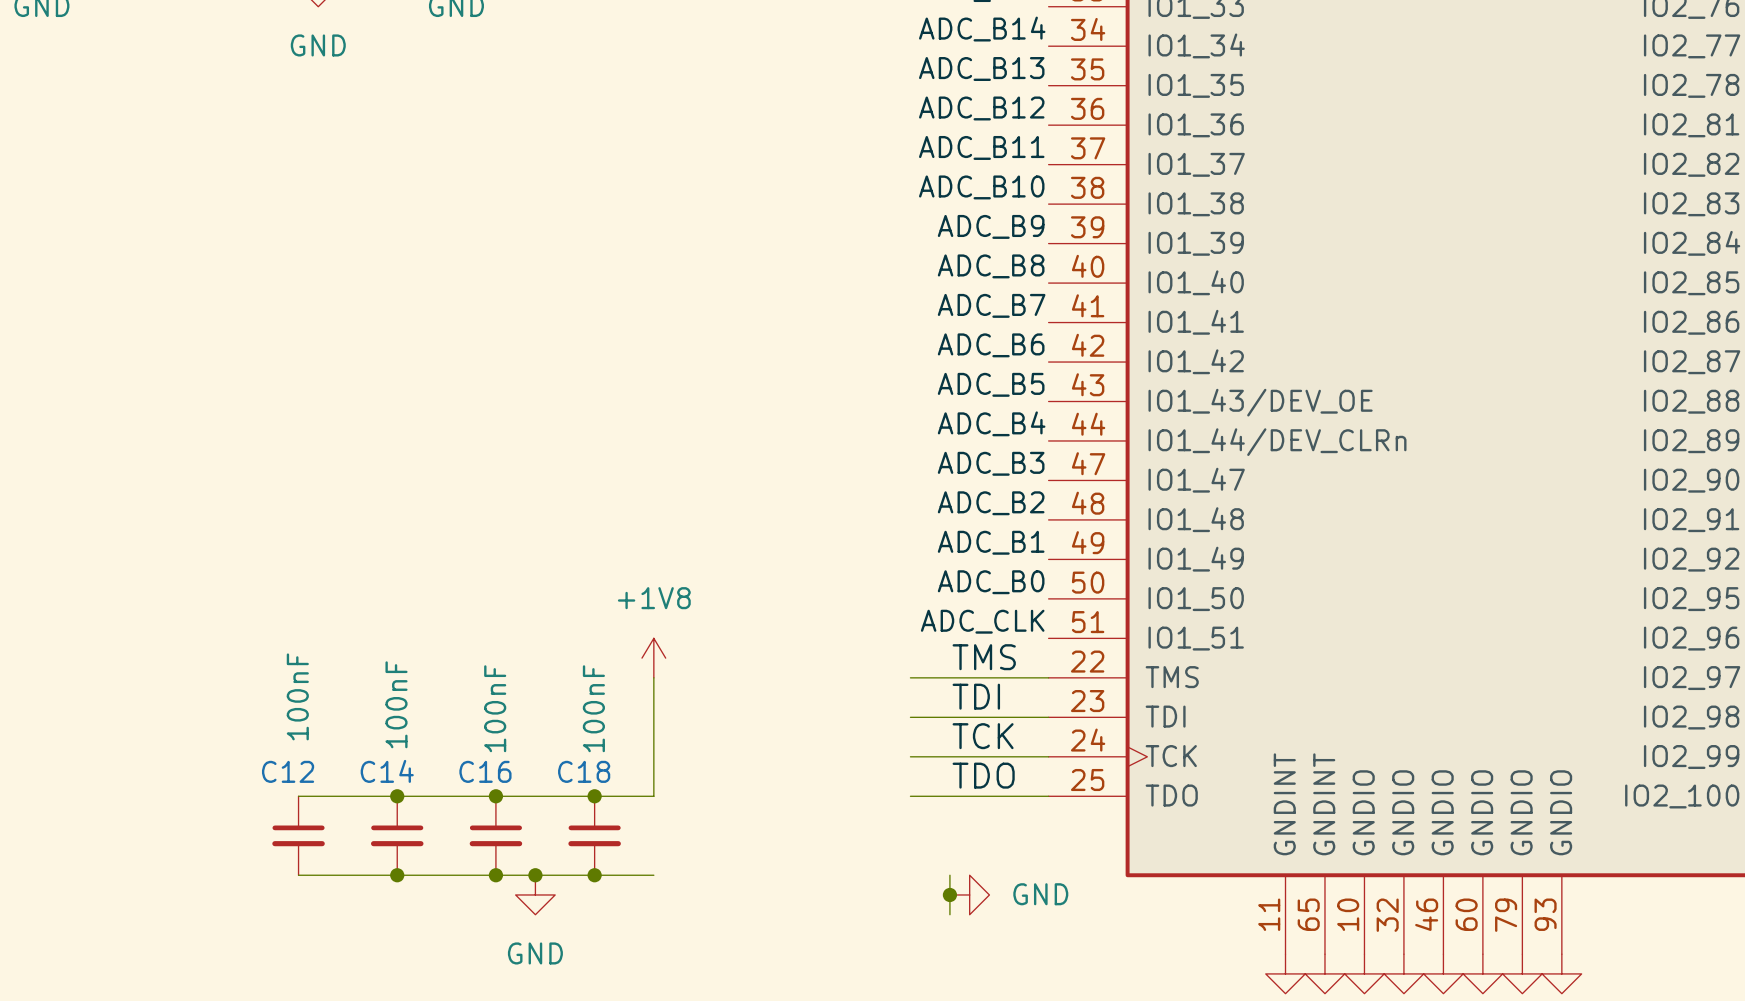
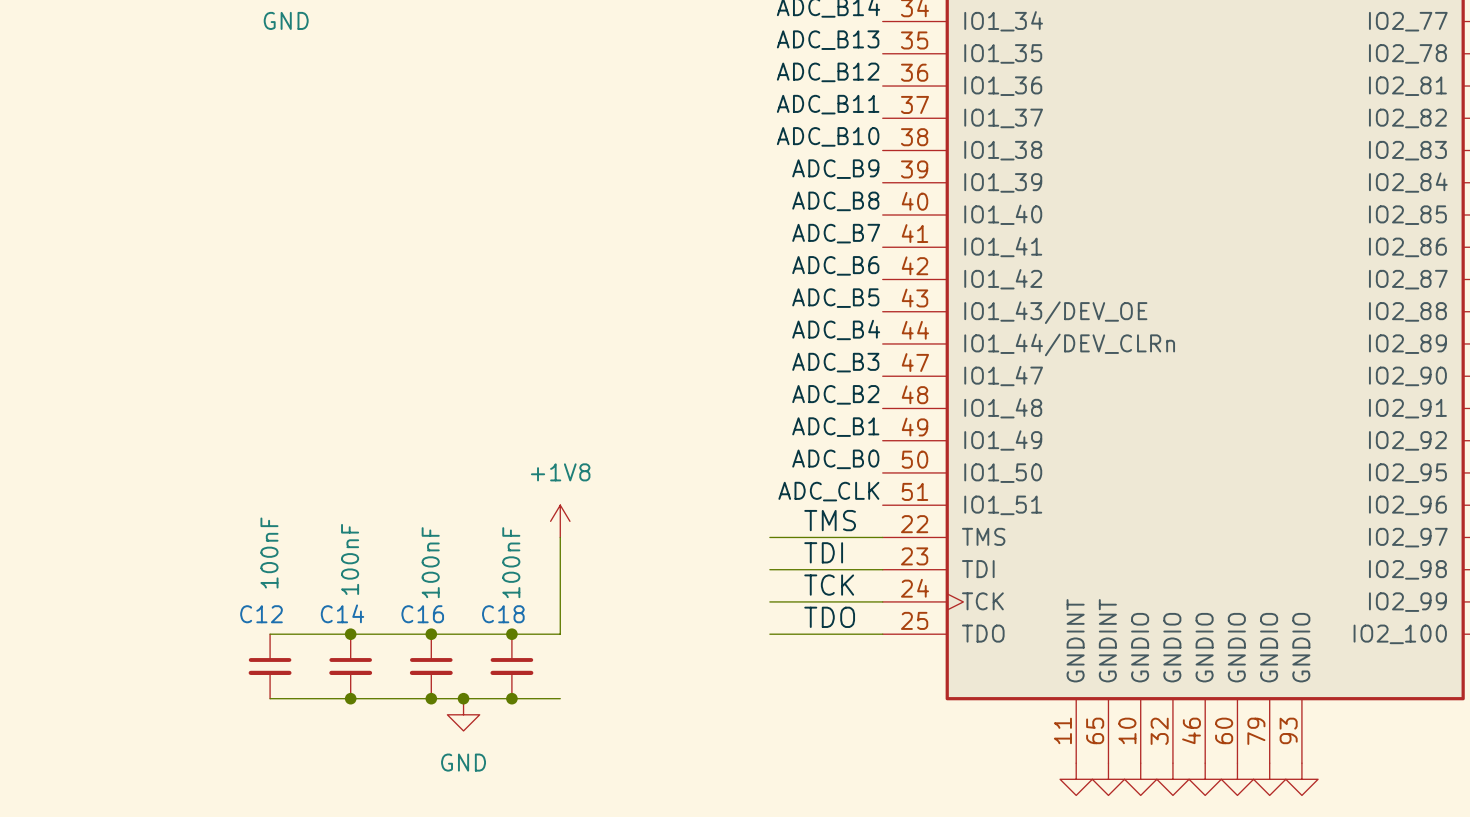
wire: (949, 875) (949, 914) -> none
junction: (949, 894) -> none
power symbol: GND (969, 894) -> none

